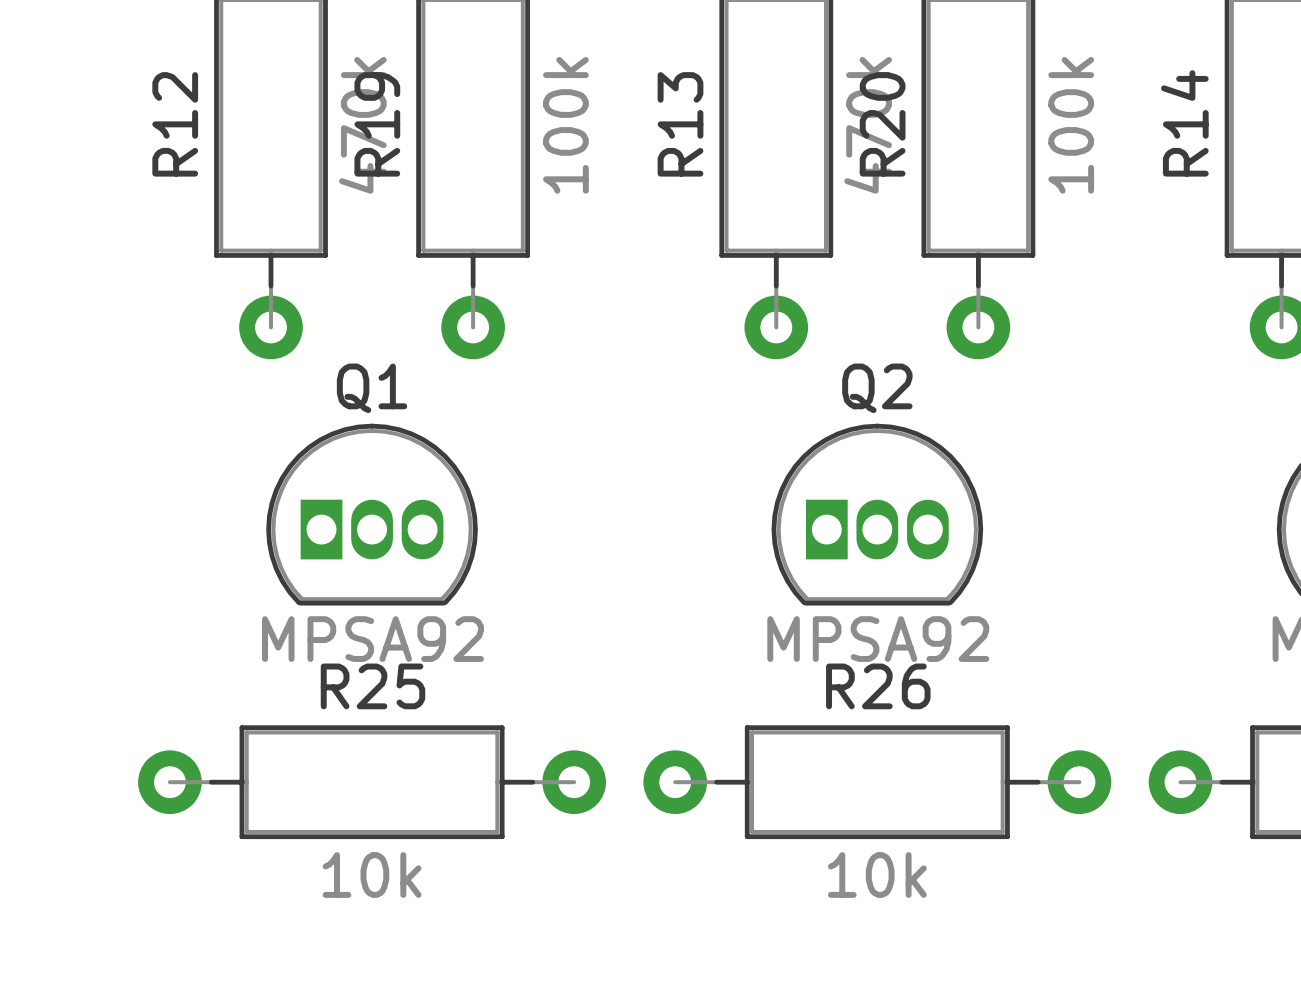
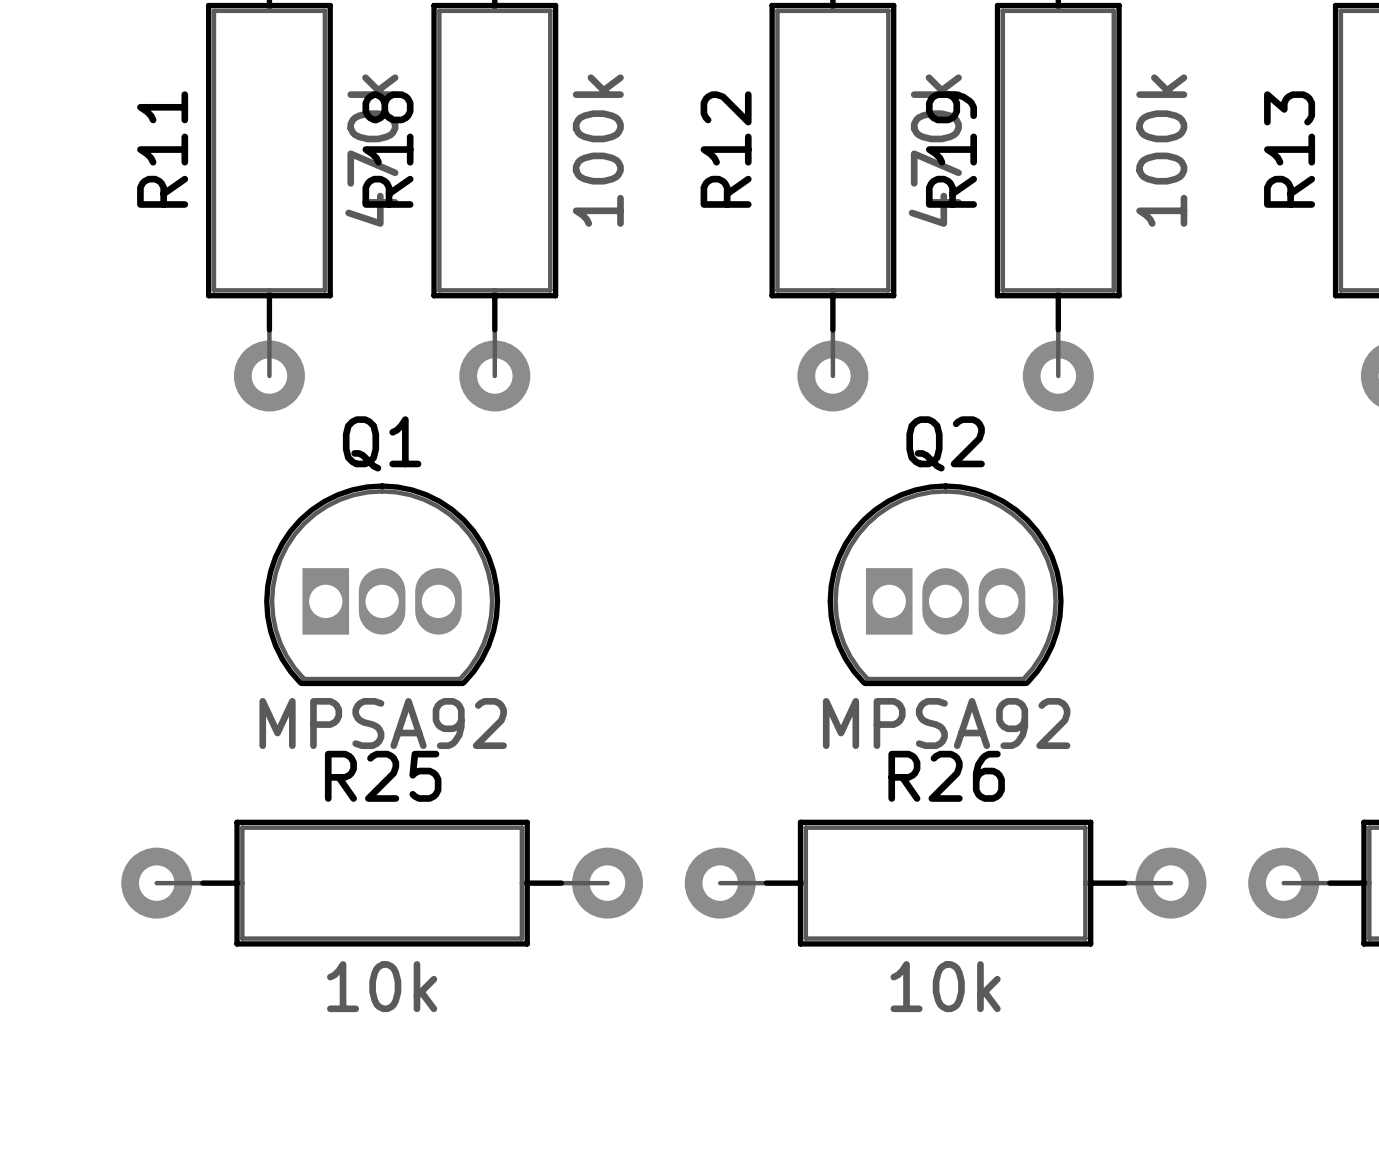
R14 name: R14 (1184, 123) -> R13 (1289, 149)
R12 name: R12 (175, 124) -> R11 (162, 149)
R19 name: R19 (377, 124) -> R18 (388, 149)
R13 name: R13 (680, 124) -> R12 (726, 149)
R20 name: R20 (882, 124) -> R19 (951, 149)

